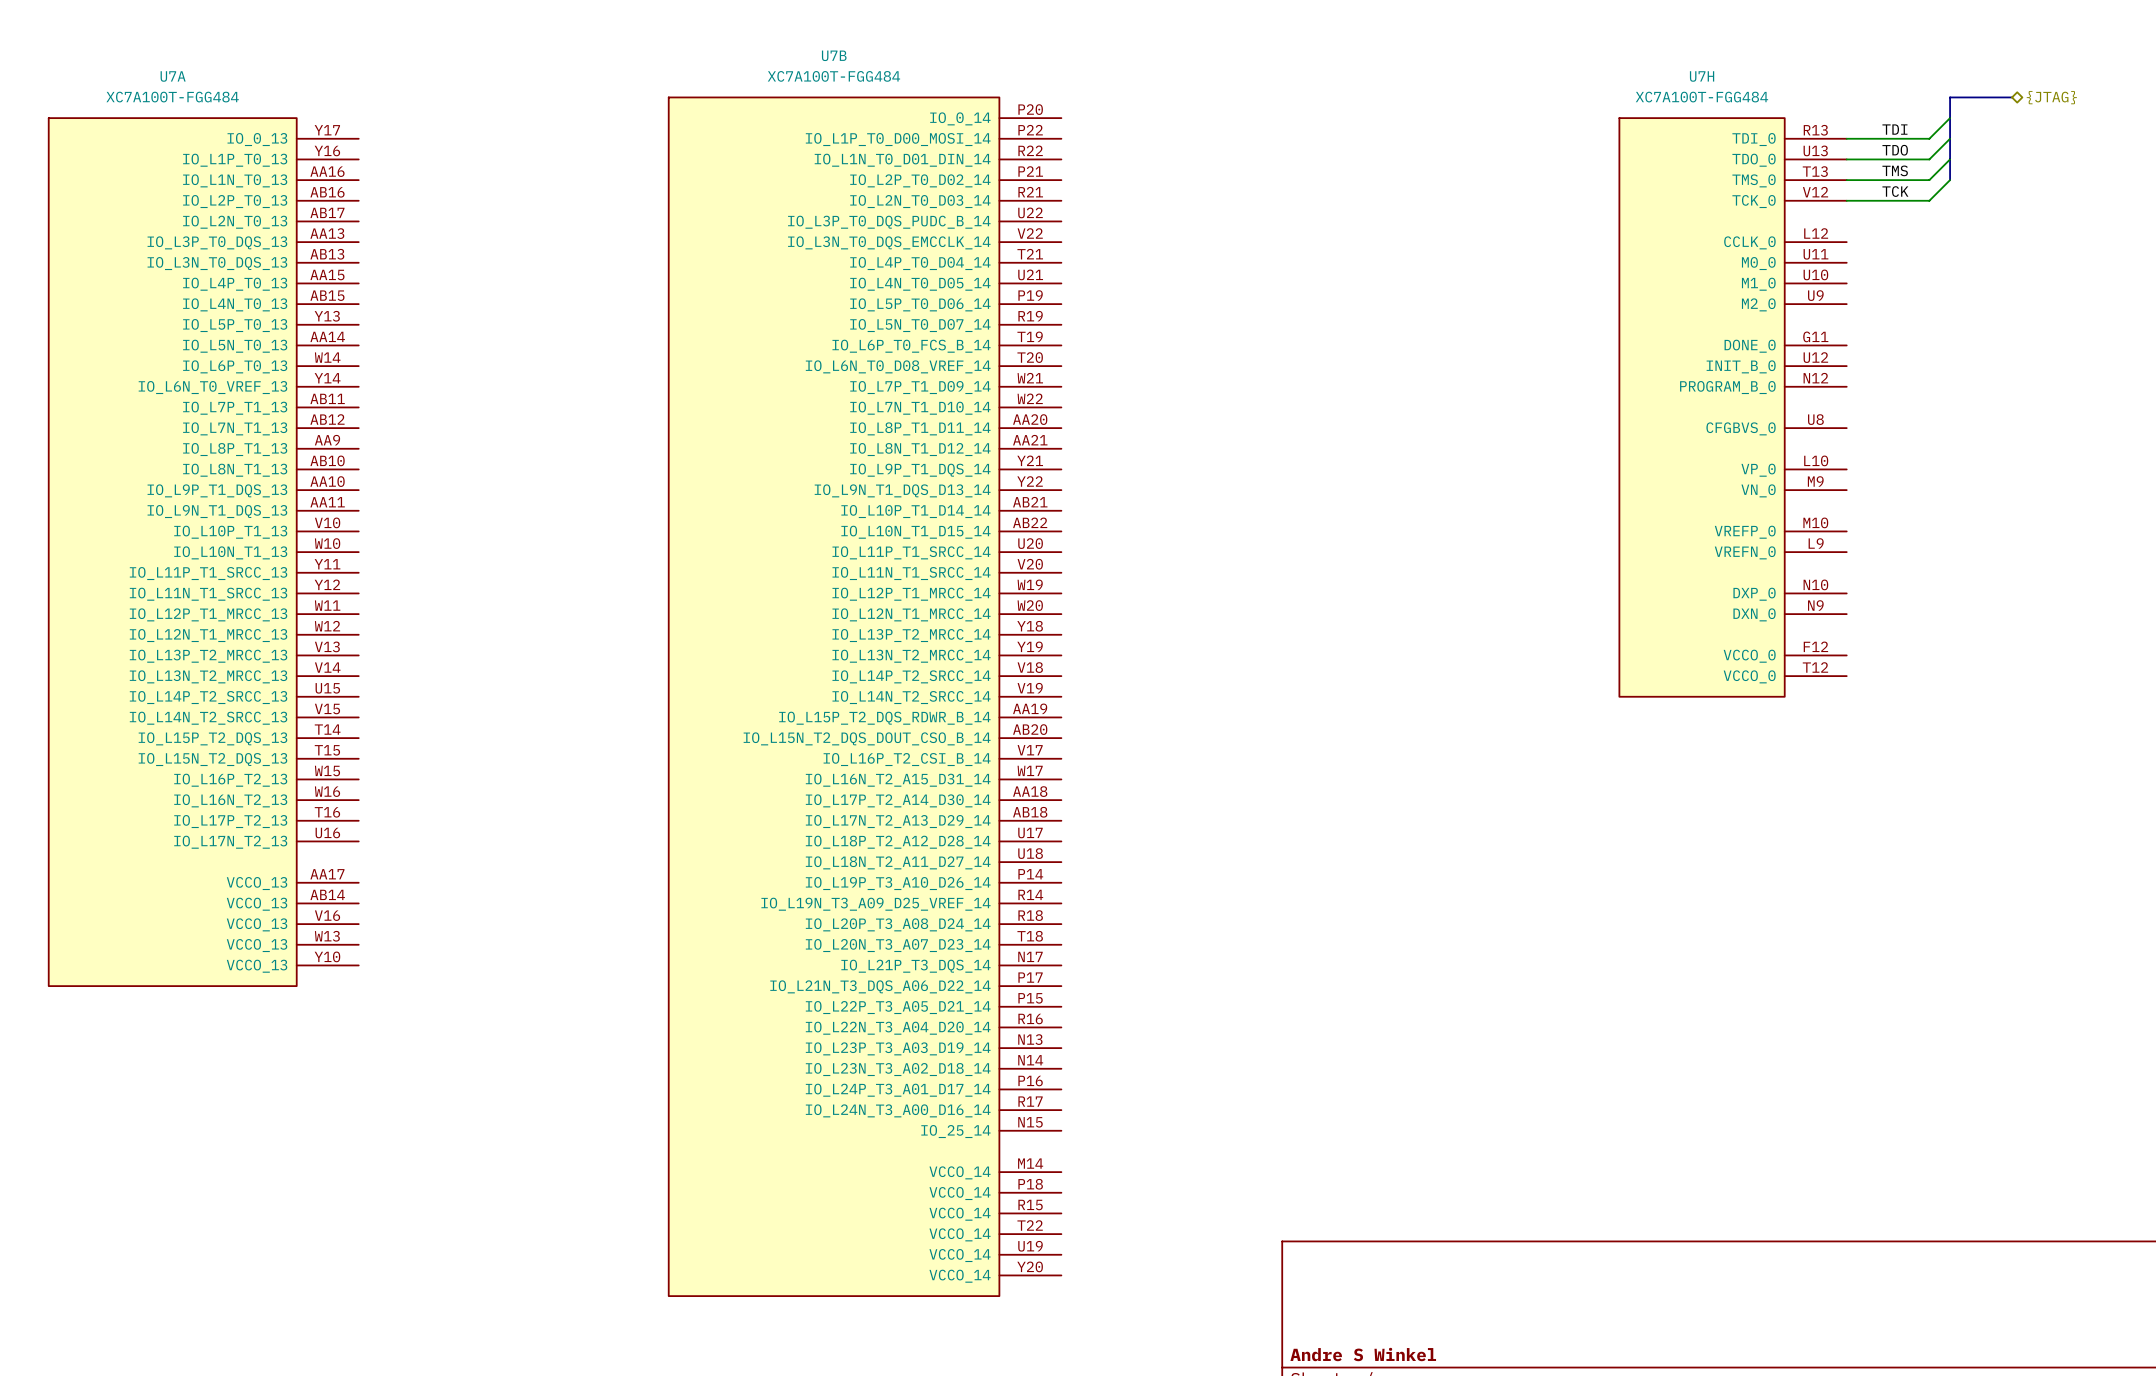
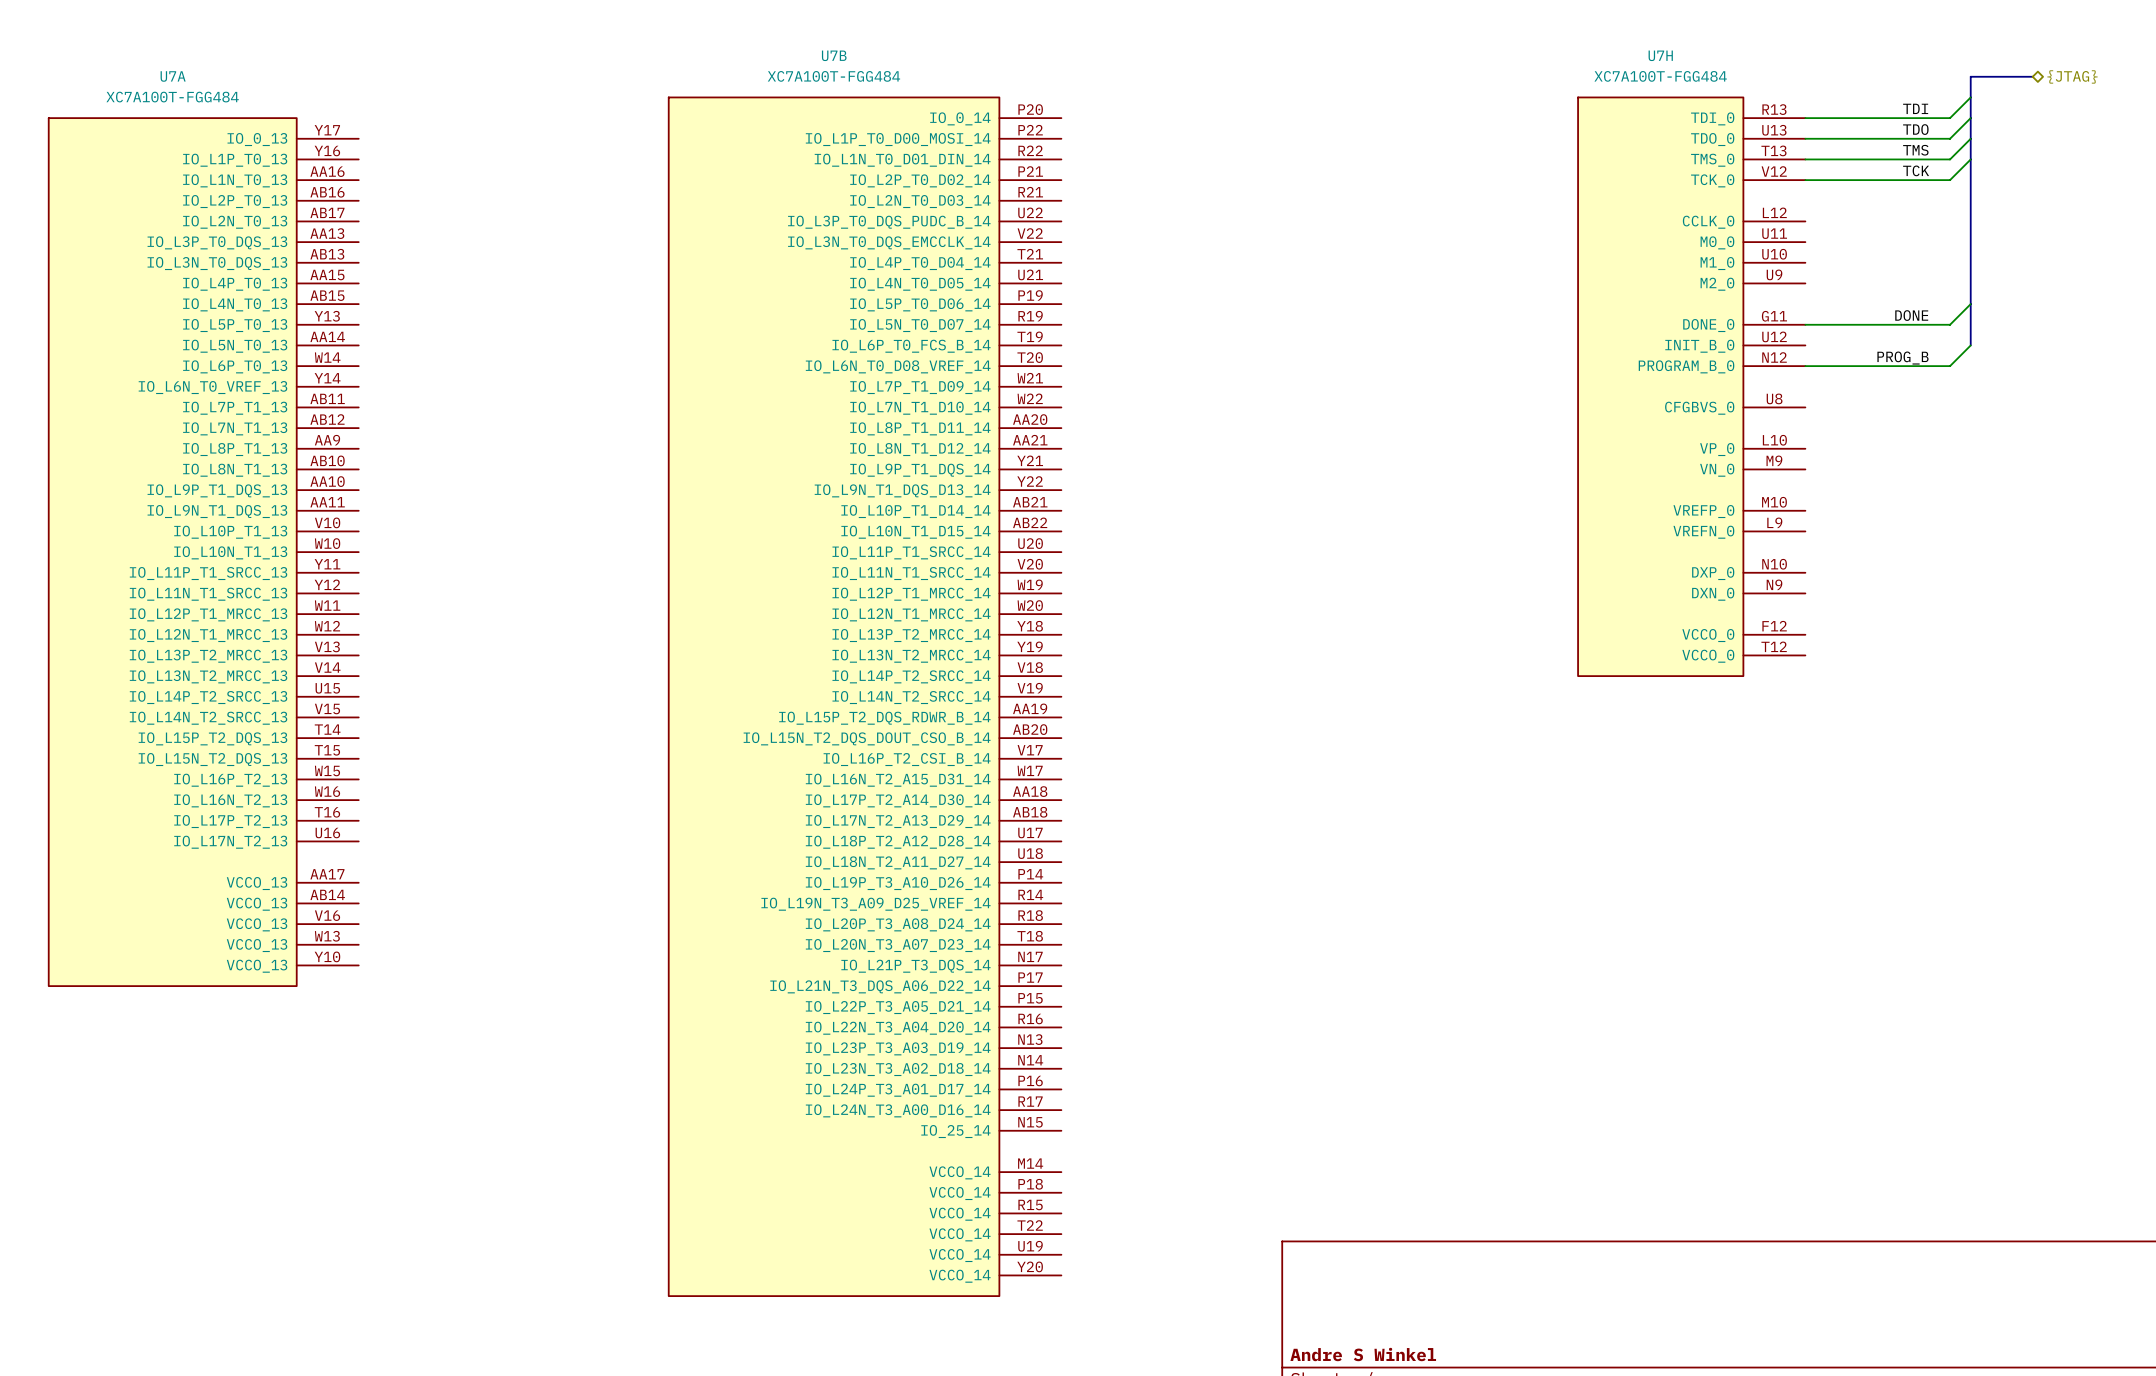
bus: none -> (2032, 76) (1970, 76) (1970, 345)
wire: none -> (1970, 97) (1950, 118) (1805, 118)
bus: (2012, 97) (1950, 97) (1950, 180) -> none
hierarchical label position: {JTAG} (2051, 97) -> {JTAG} (2072, 76)
wire: (1950, 118) (1929, 138) -> (1970, 118) (1950, 138) (1929, 138)
label position: TDI (1894, 129) -> TDI (1915, 108)
wire: (1950, 138) (1929, 159) -> (1970, 138) (1950, 159) (1929, 159)
label position: TDO (1895, 150) -> TDO (1915, 129)
wire: (1950, 159) (1929, 180) -> (1970, 159) (1950, 180) (1929, 180)
label position: TMS (1895, 170) -> TMS (1915, 150)
wire: (1950, 180) (1929, 200) (1846, 200) -> none
label position: TCK (1895, 191) -> TCK (1916, 170)
wire: none -> (1970, 304) (1950, 324) (1805, 324)
label: none -> DONE (1911, 315)
wire: none -> (1970, 345) (1950, 366) (1805, 366)
label: none -> PROG_B (1902, 358)
U7H position: (1733, 407) -> (1691, 386)

